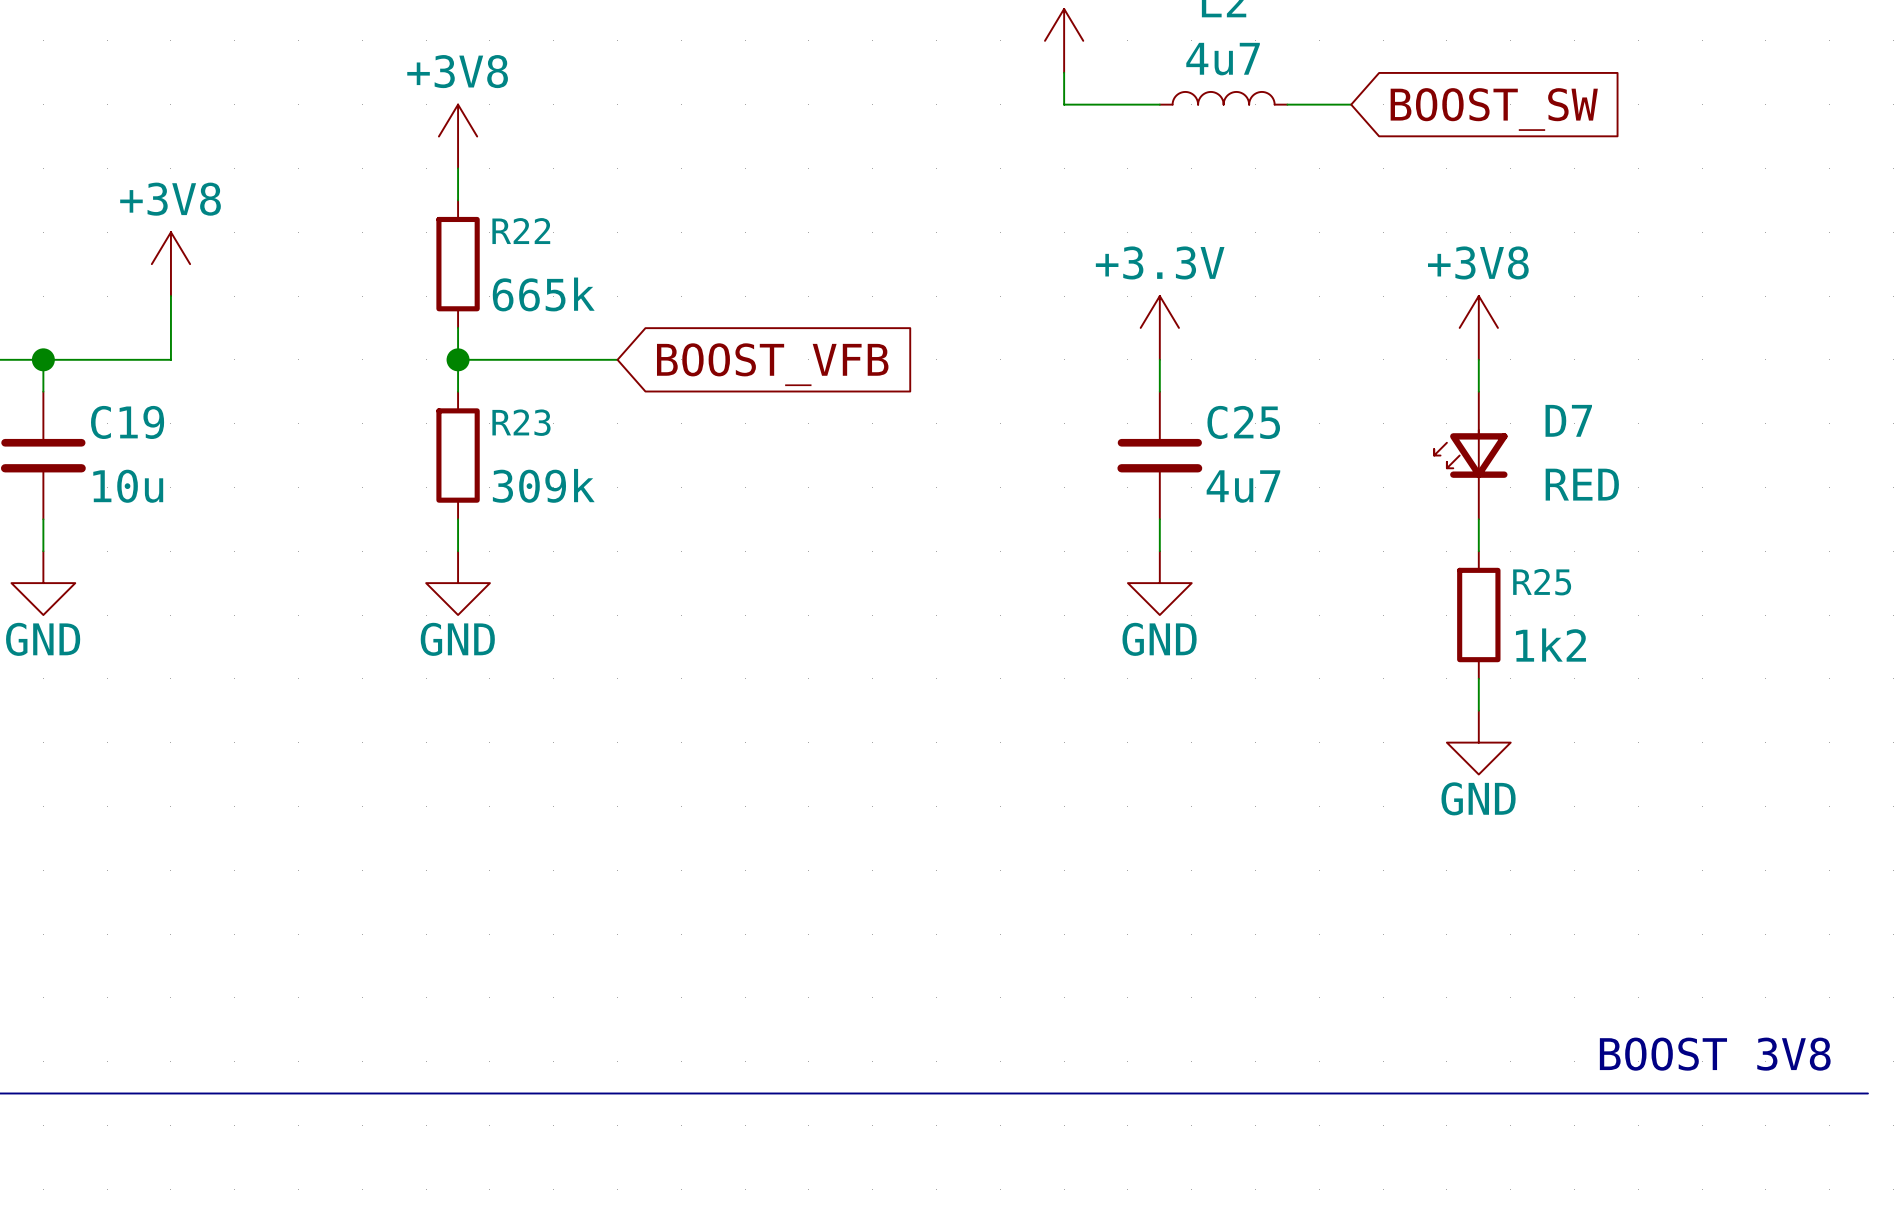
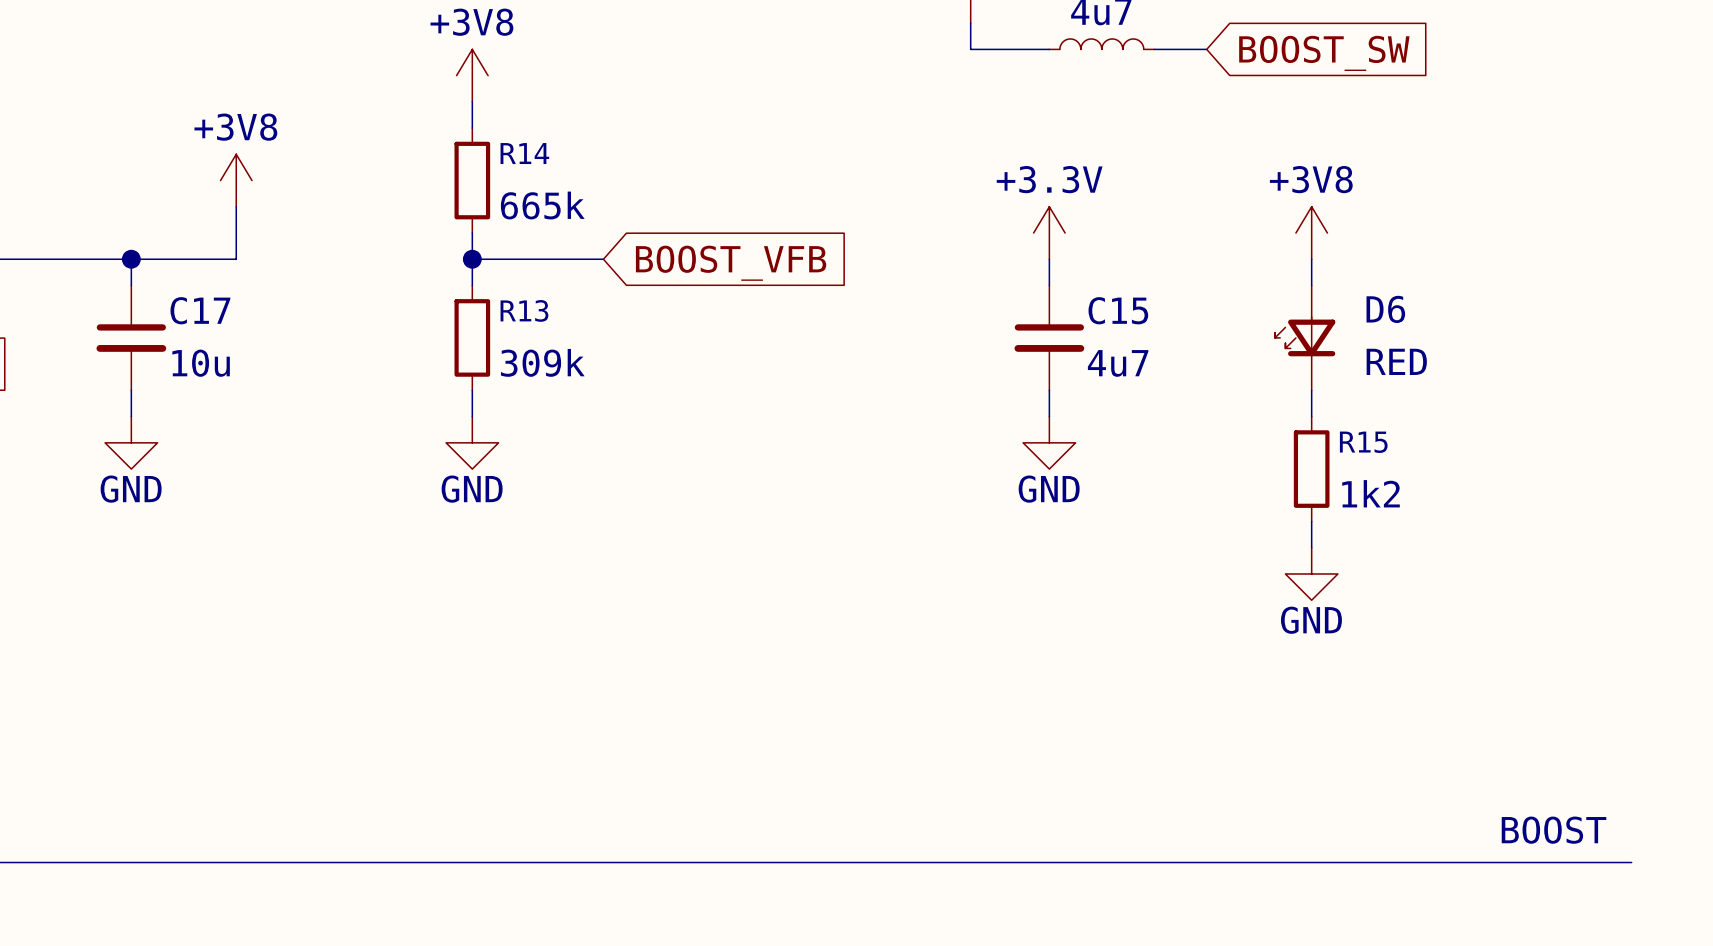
R22 name: R22 (521, 231) -> R14 (524, 153)
D7 name: D7 (1568, 420) -> D6 (1385, 309)
C19 name: C19 (127, 422) -> C17 (200, 310)
R23 name: R23 (521, 422) -> R13 (524, 310)
C25 name: C25 (1243, 422) -> C15 (1118, 310)
R25 name: R25 (1542, 582) -> R15 (1363, 442)
text: BOOST 3V8 (1715, 1054) -> BOOST (1554, 830)

